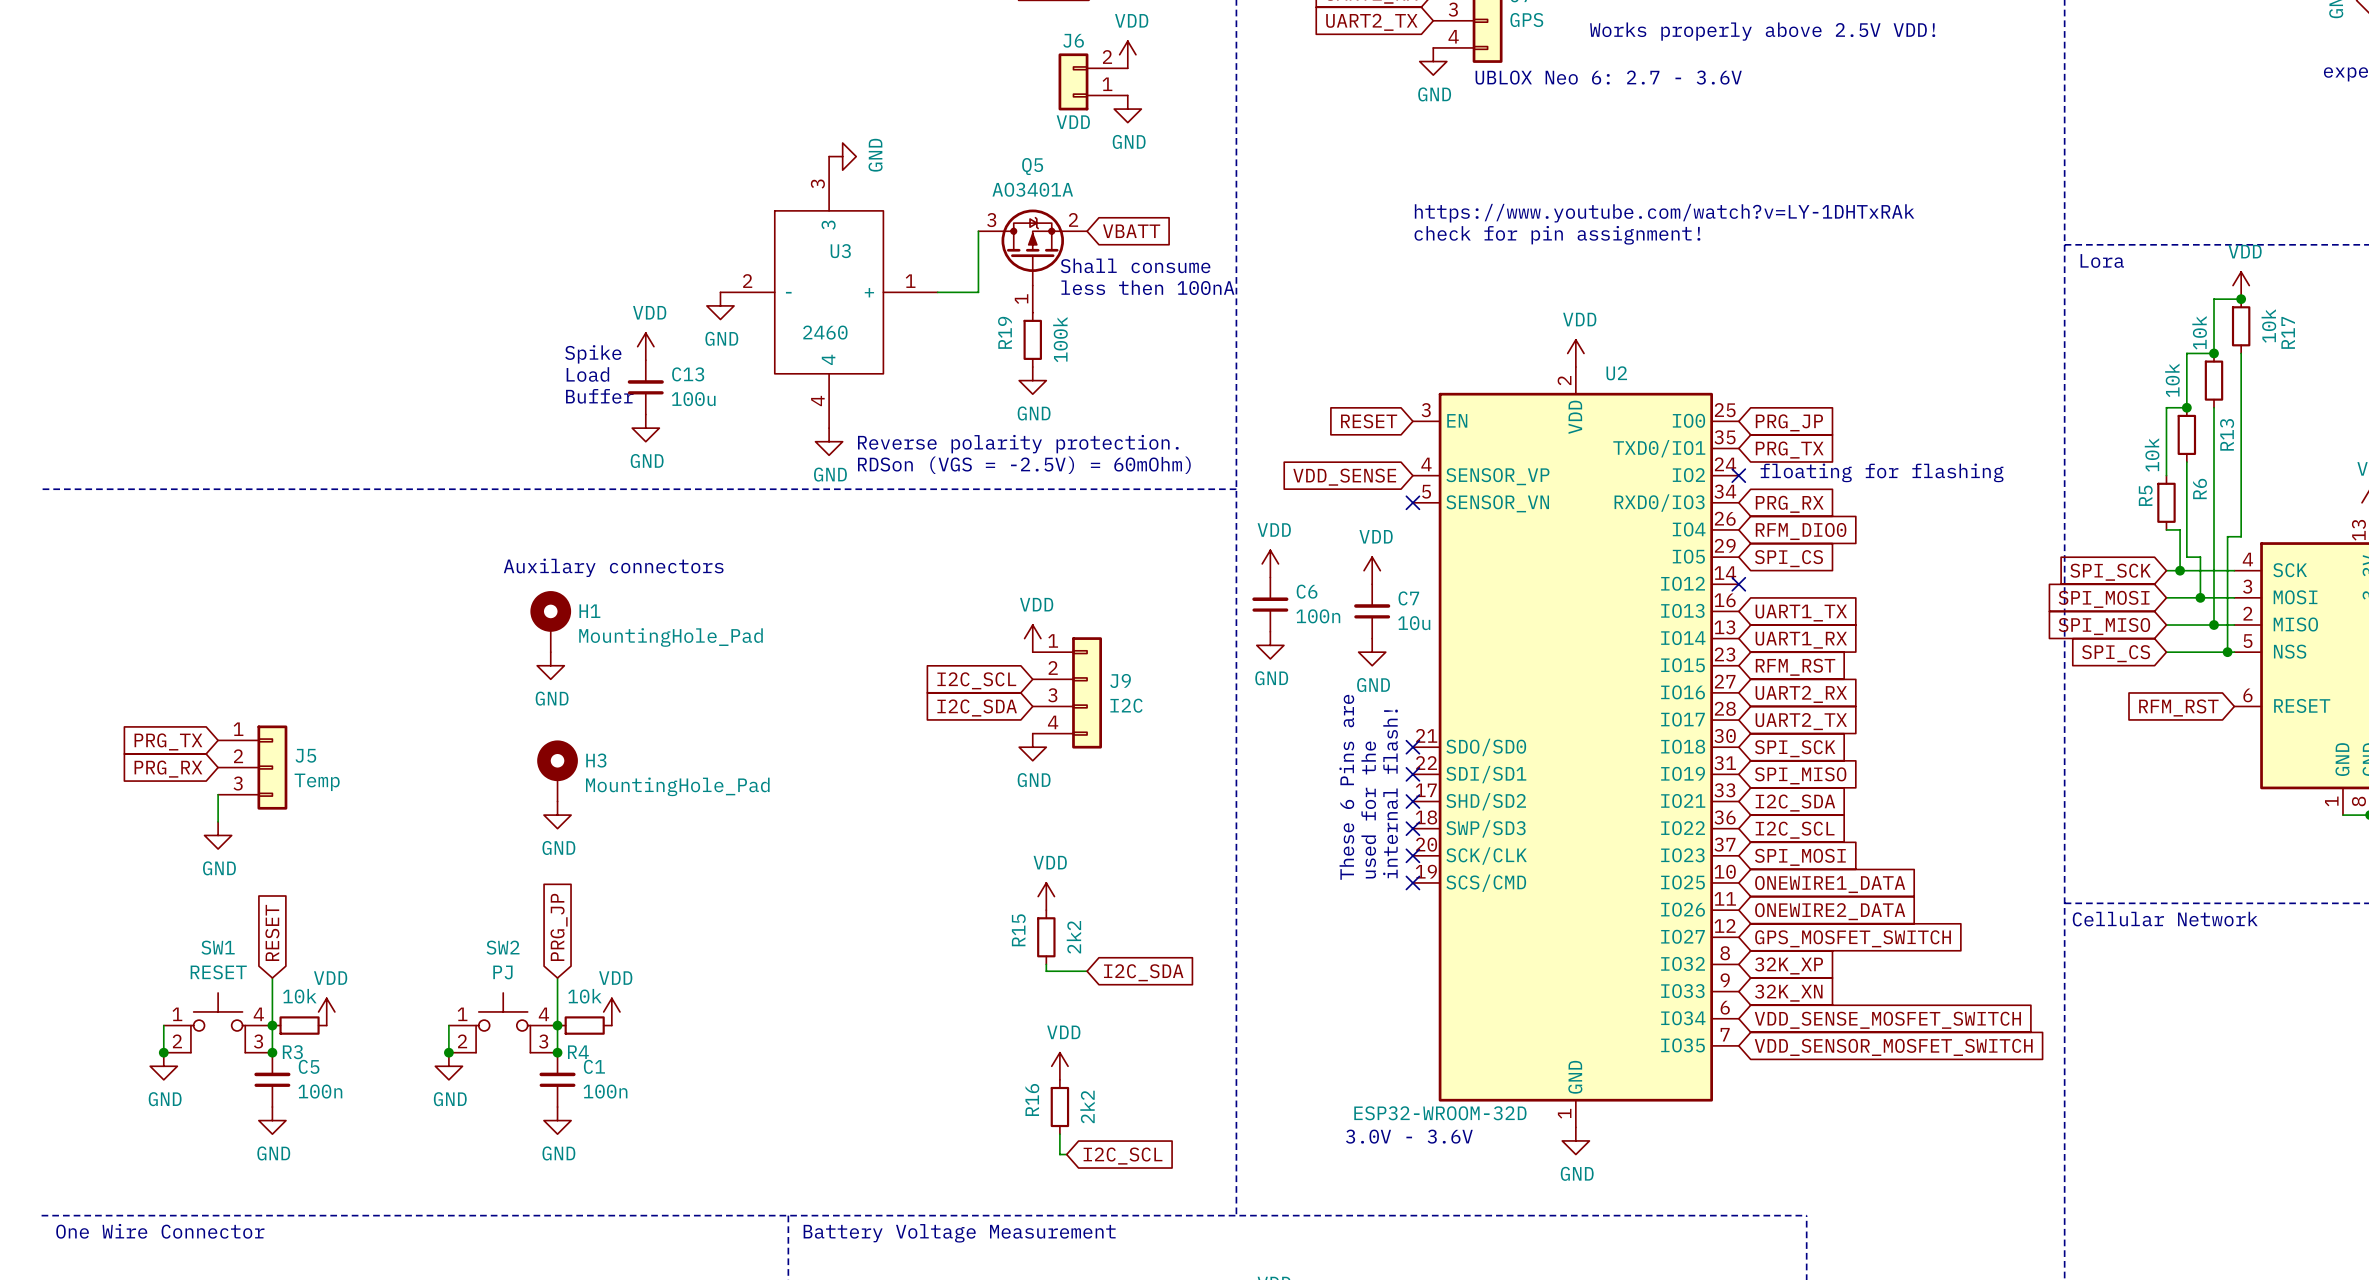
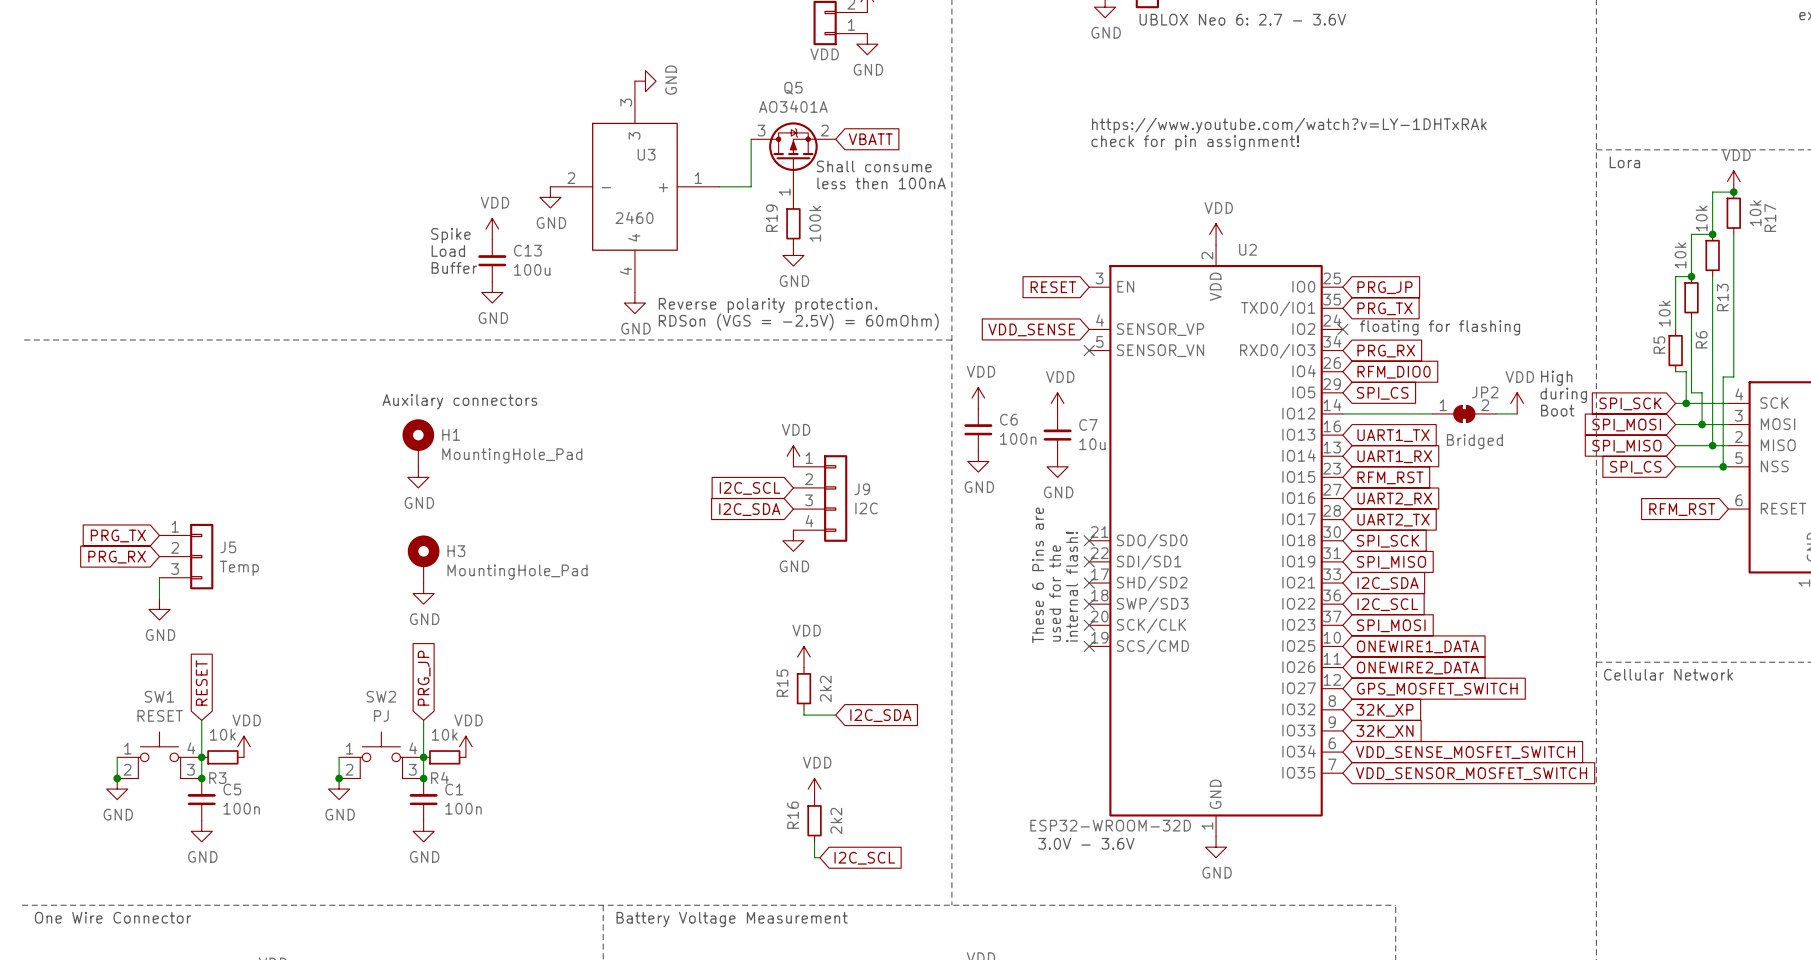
text: none -> High (1556, 378)
text: none -> during (1563, 395)
power symbol: none -> VDD (1517, 403)
text: none -> Boot (1557, 410)
wire: none -> (1342, 413) (1432, 413)
no-connect mark: (1738, 584) -> none
JP2: none -> Bridged (1464, 413)
wire: none -> (1496, 413) (1517, 413)

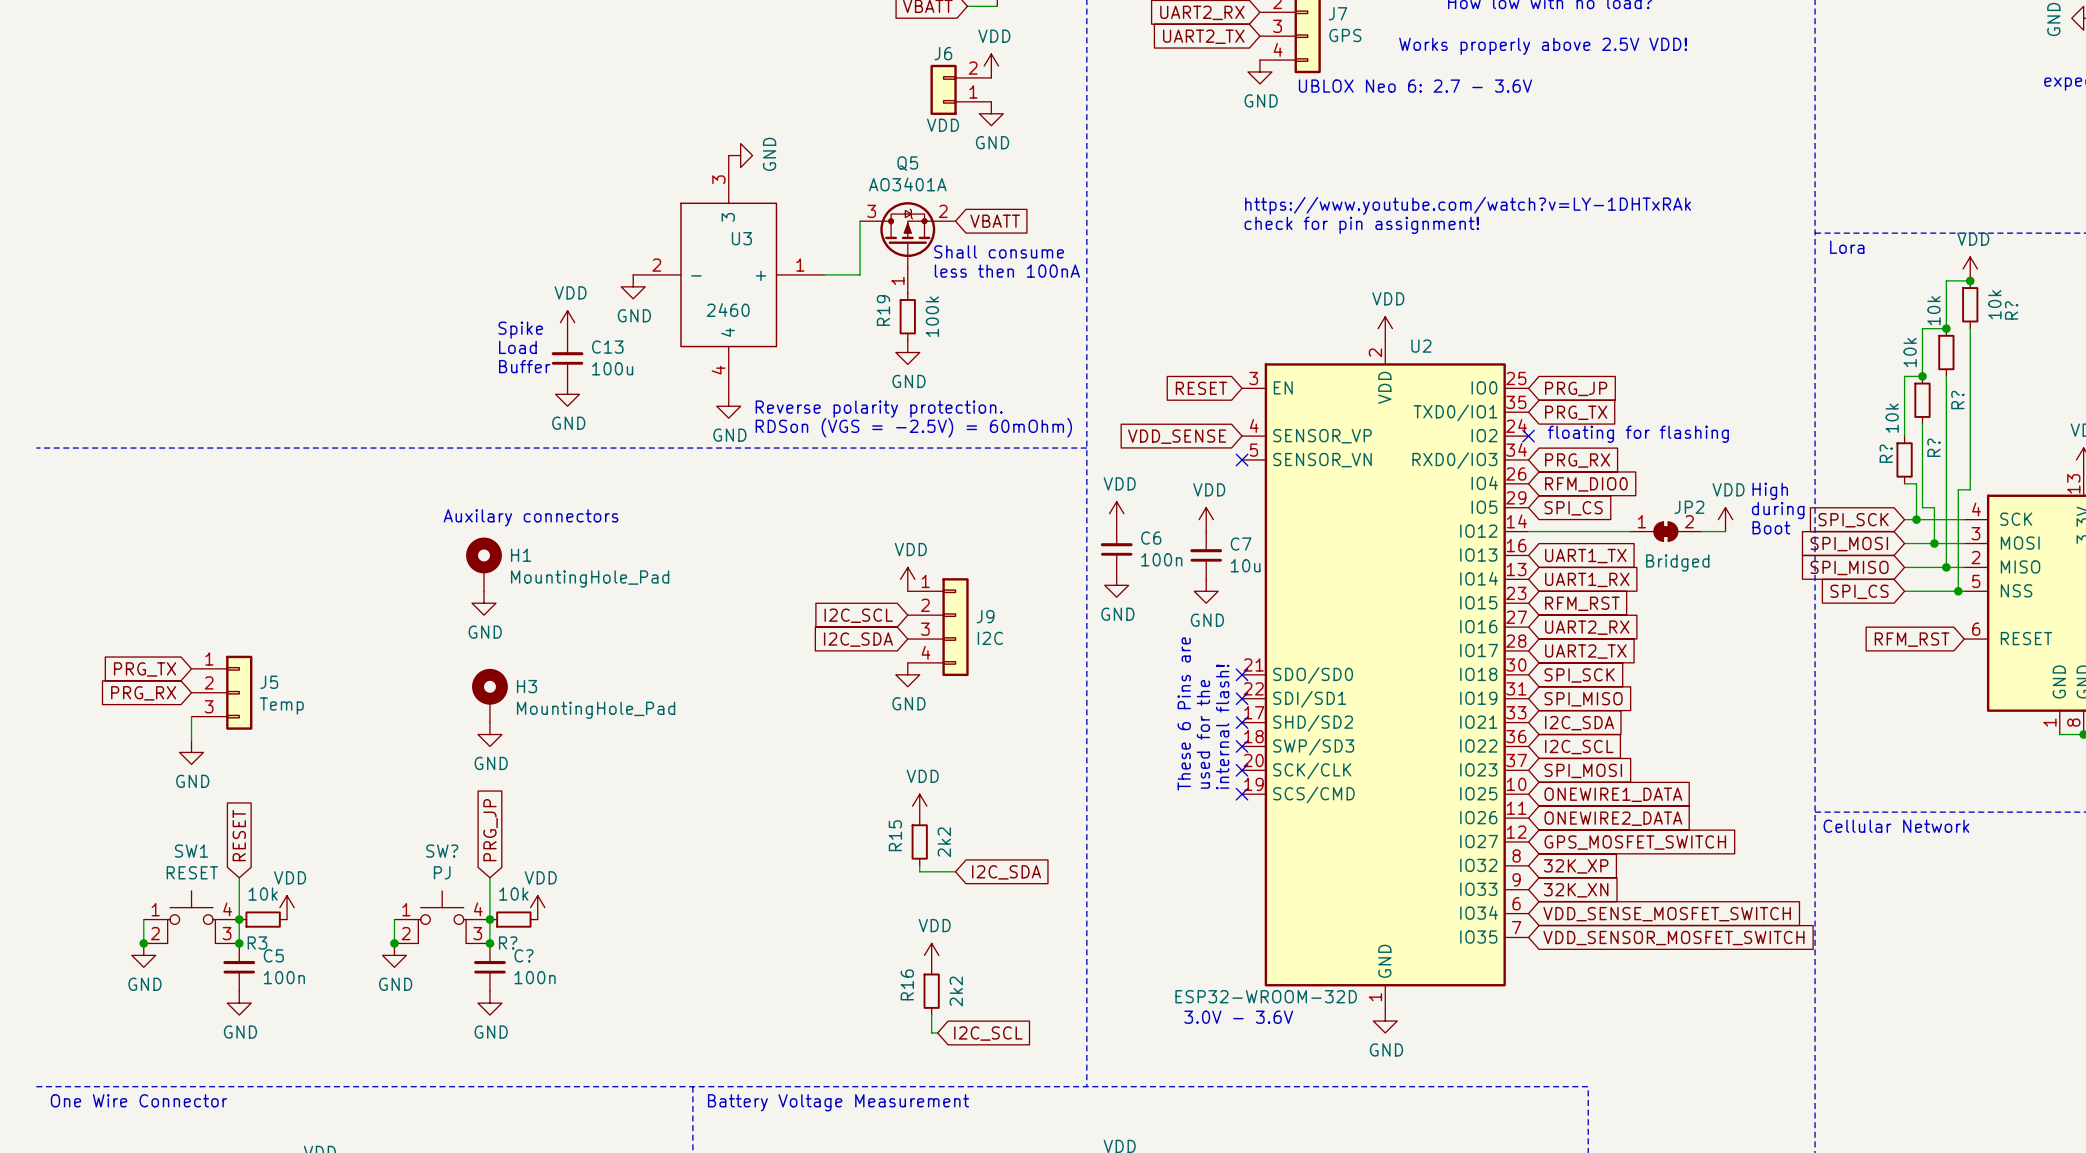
R17 name: R17 (1770, 218) -> R? (2011, 310)
R13 name: R13 (1722, 297) -> R? (1957, 399)
R6 name: R6 (1701, 339) -> R? (1933, 447)
R5 name: R5 (1659, 345) -> R? (1886, 453)
SW2 name: SW2 (381, 696) -> SW? (442, 851)
R4 name: R4 (439, 777) -> R? (508, 942)
C1 name: C1 (454, 789) -> C? (523, 955)

